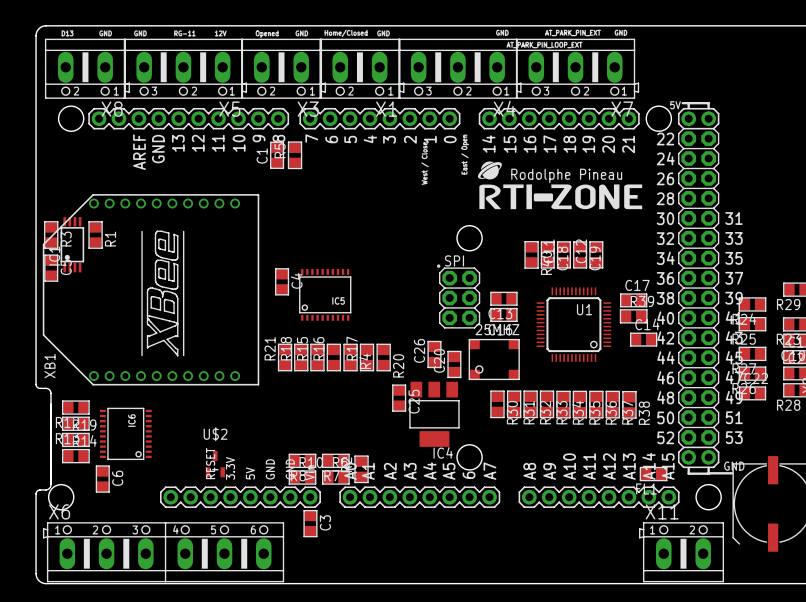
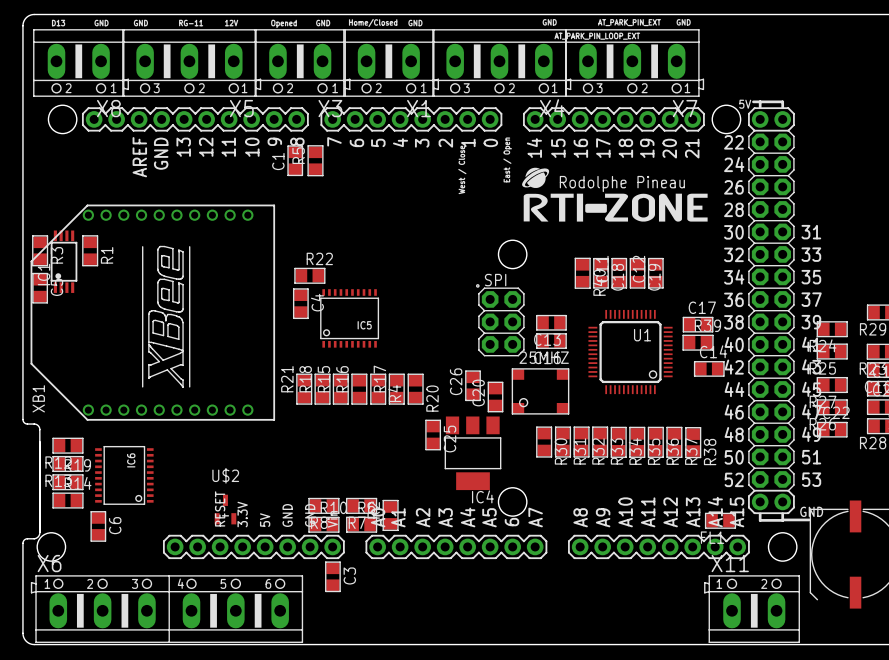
R22: none -> (309, 275)

